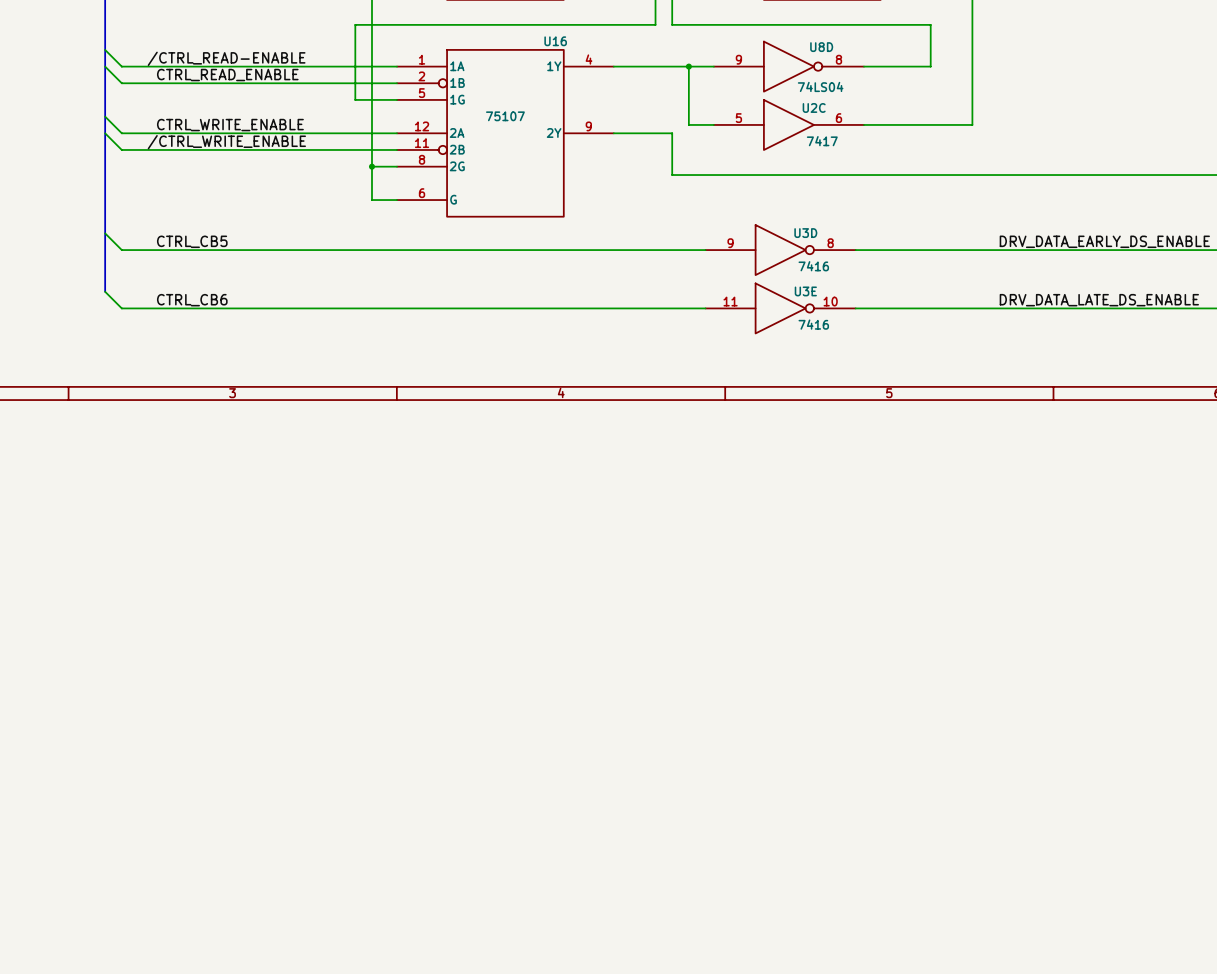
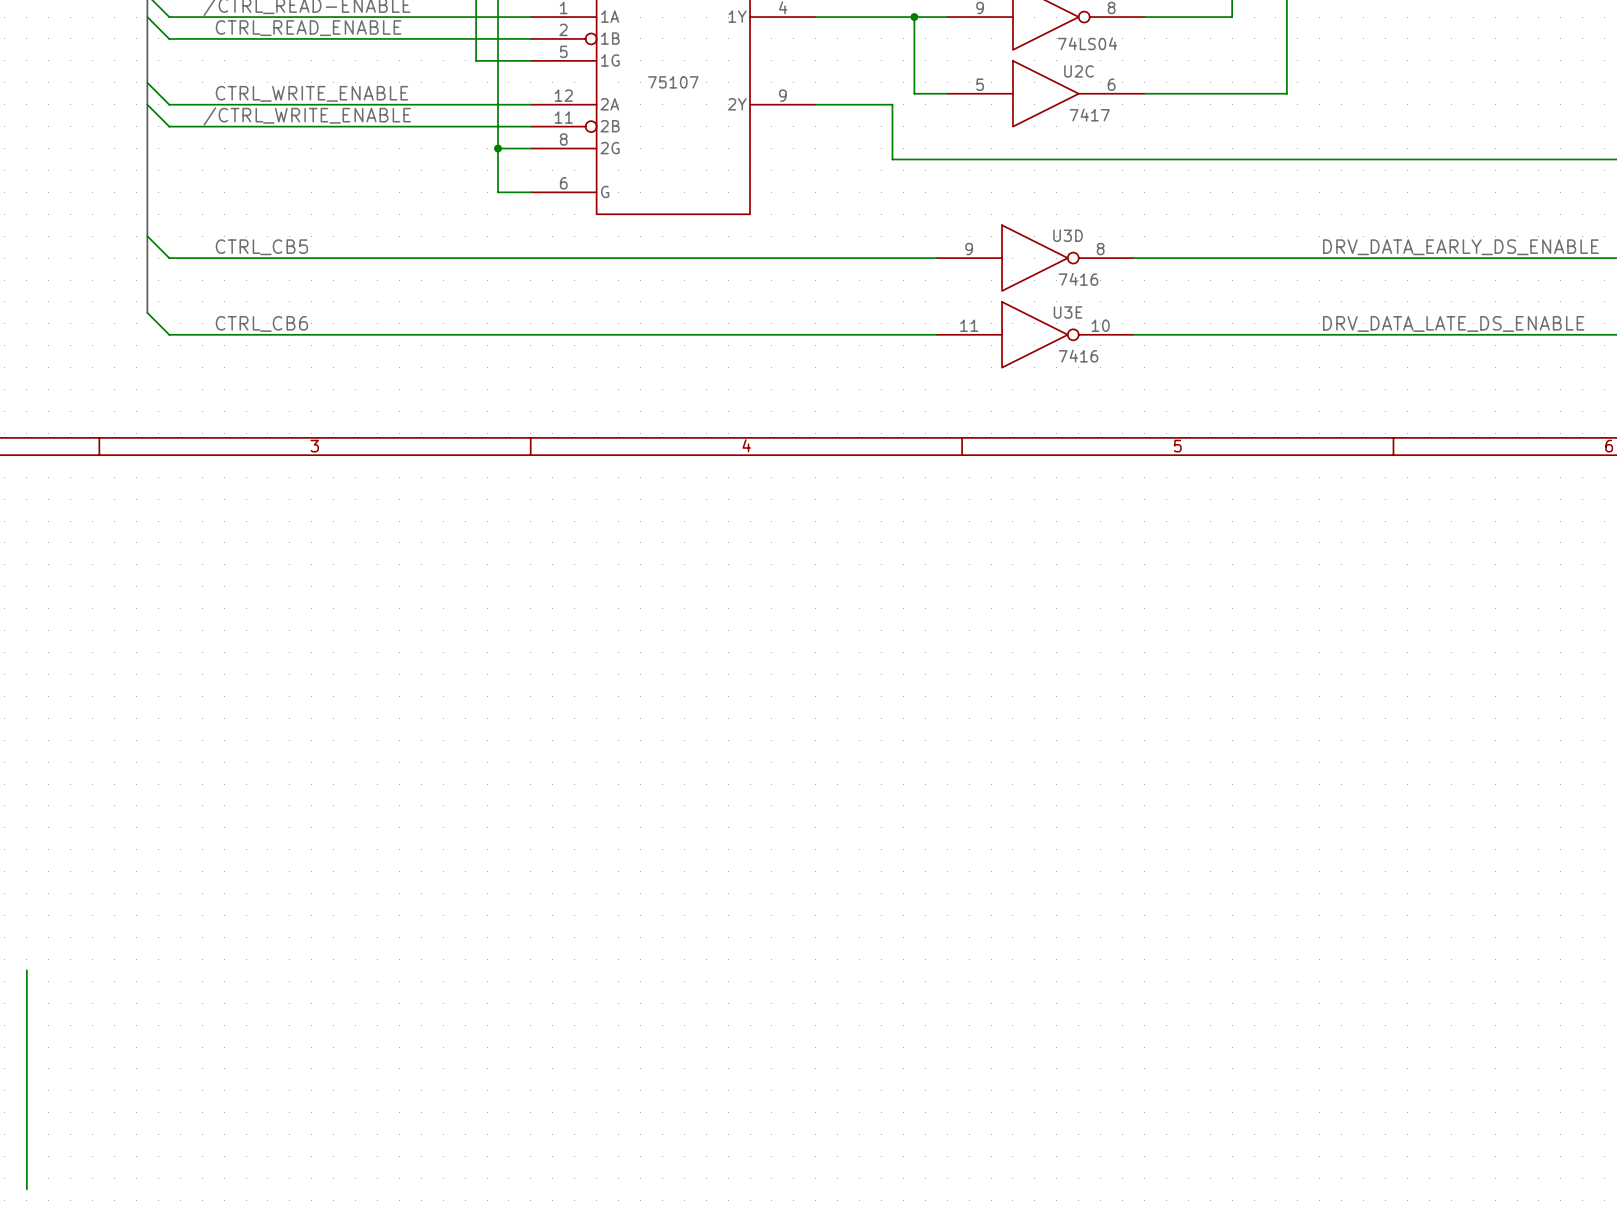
wire: none -> (26, 970) (26, 1189)

